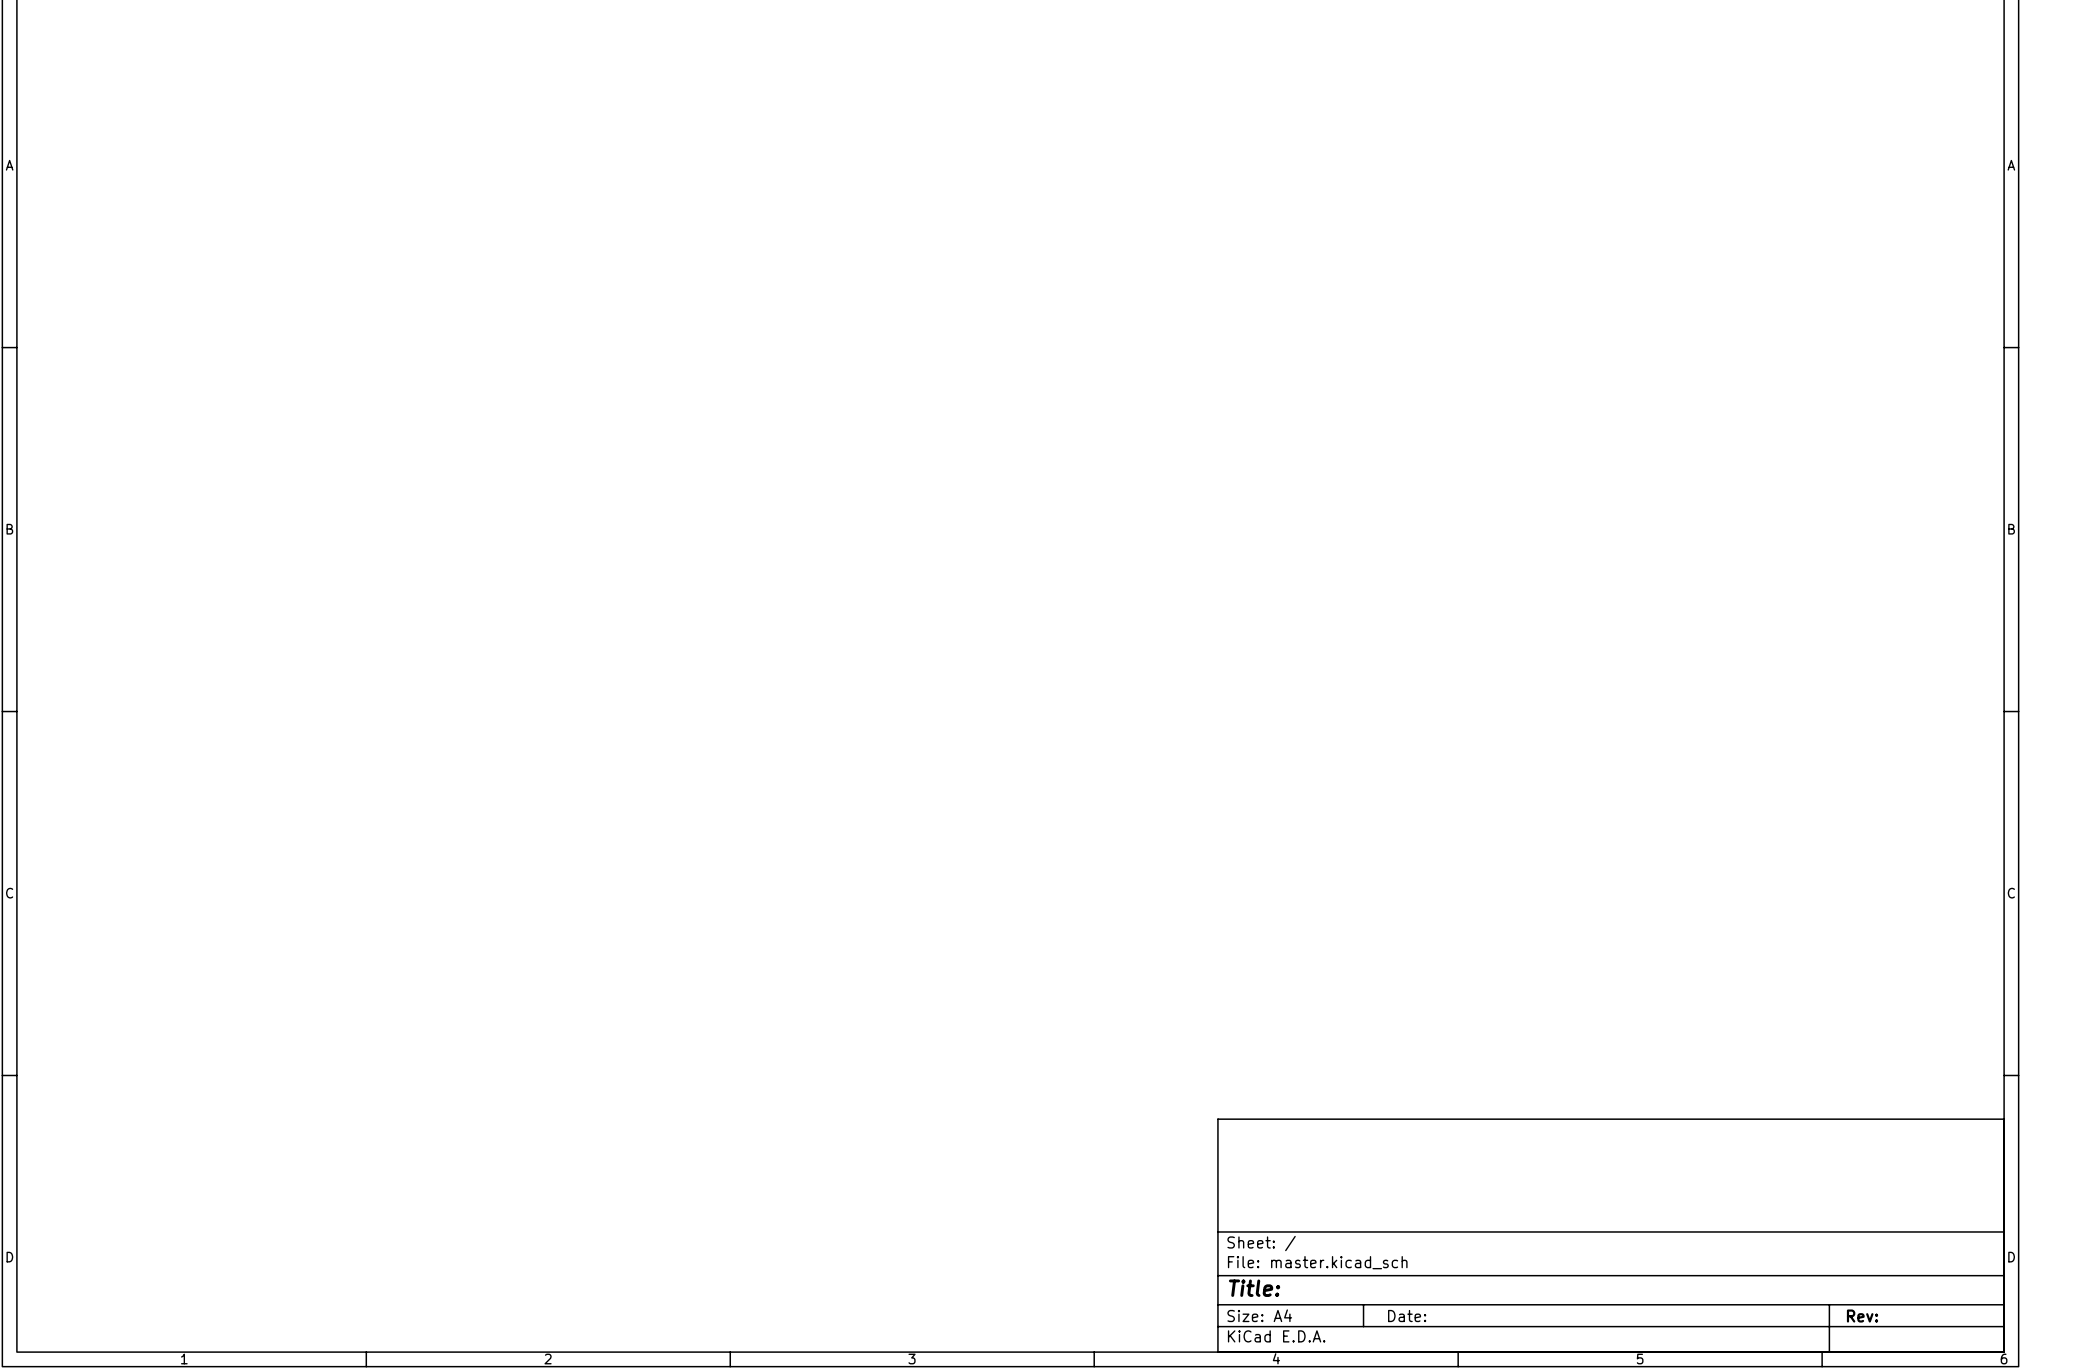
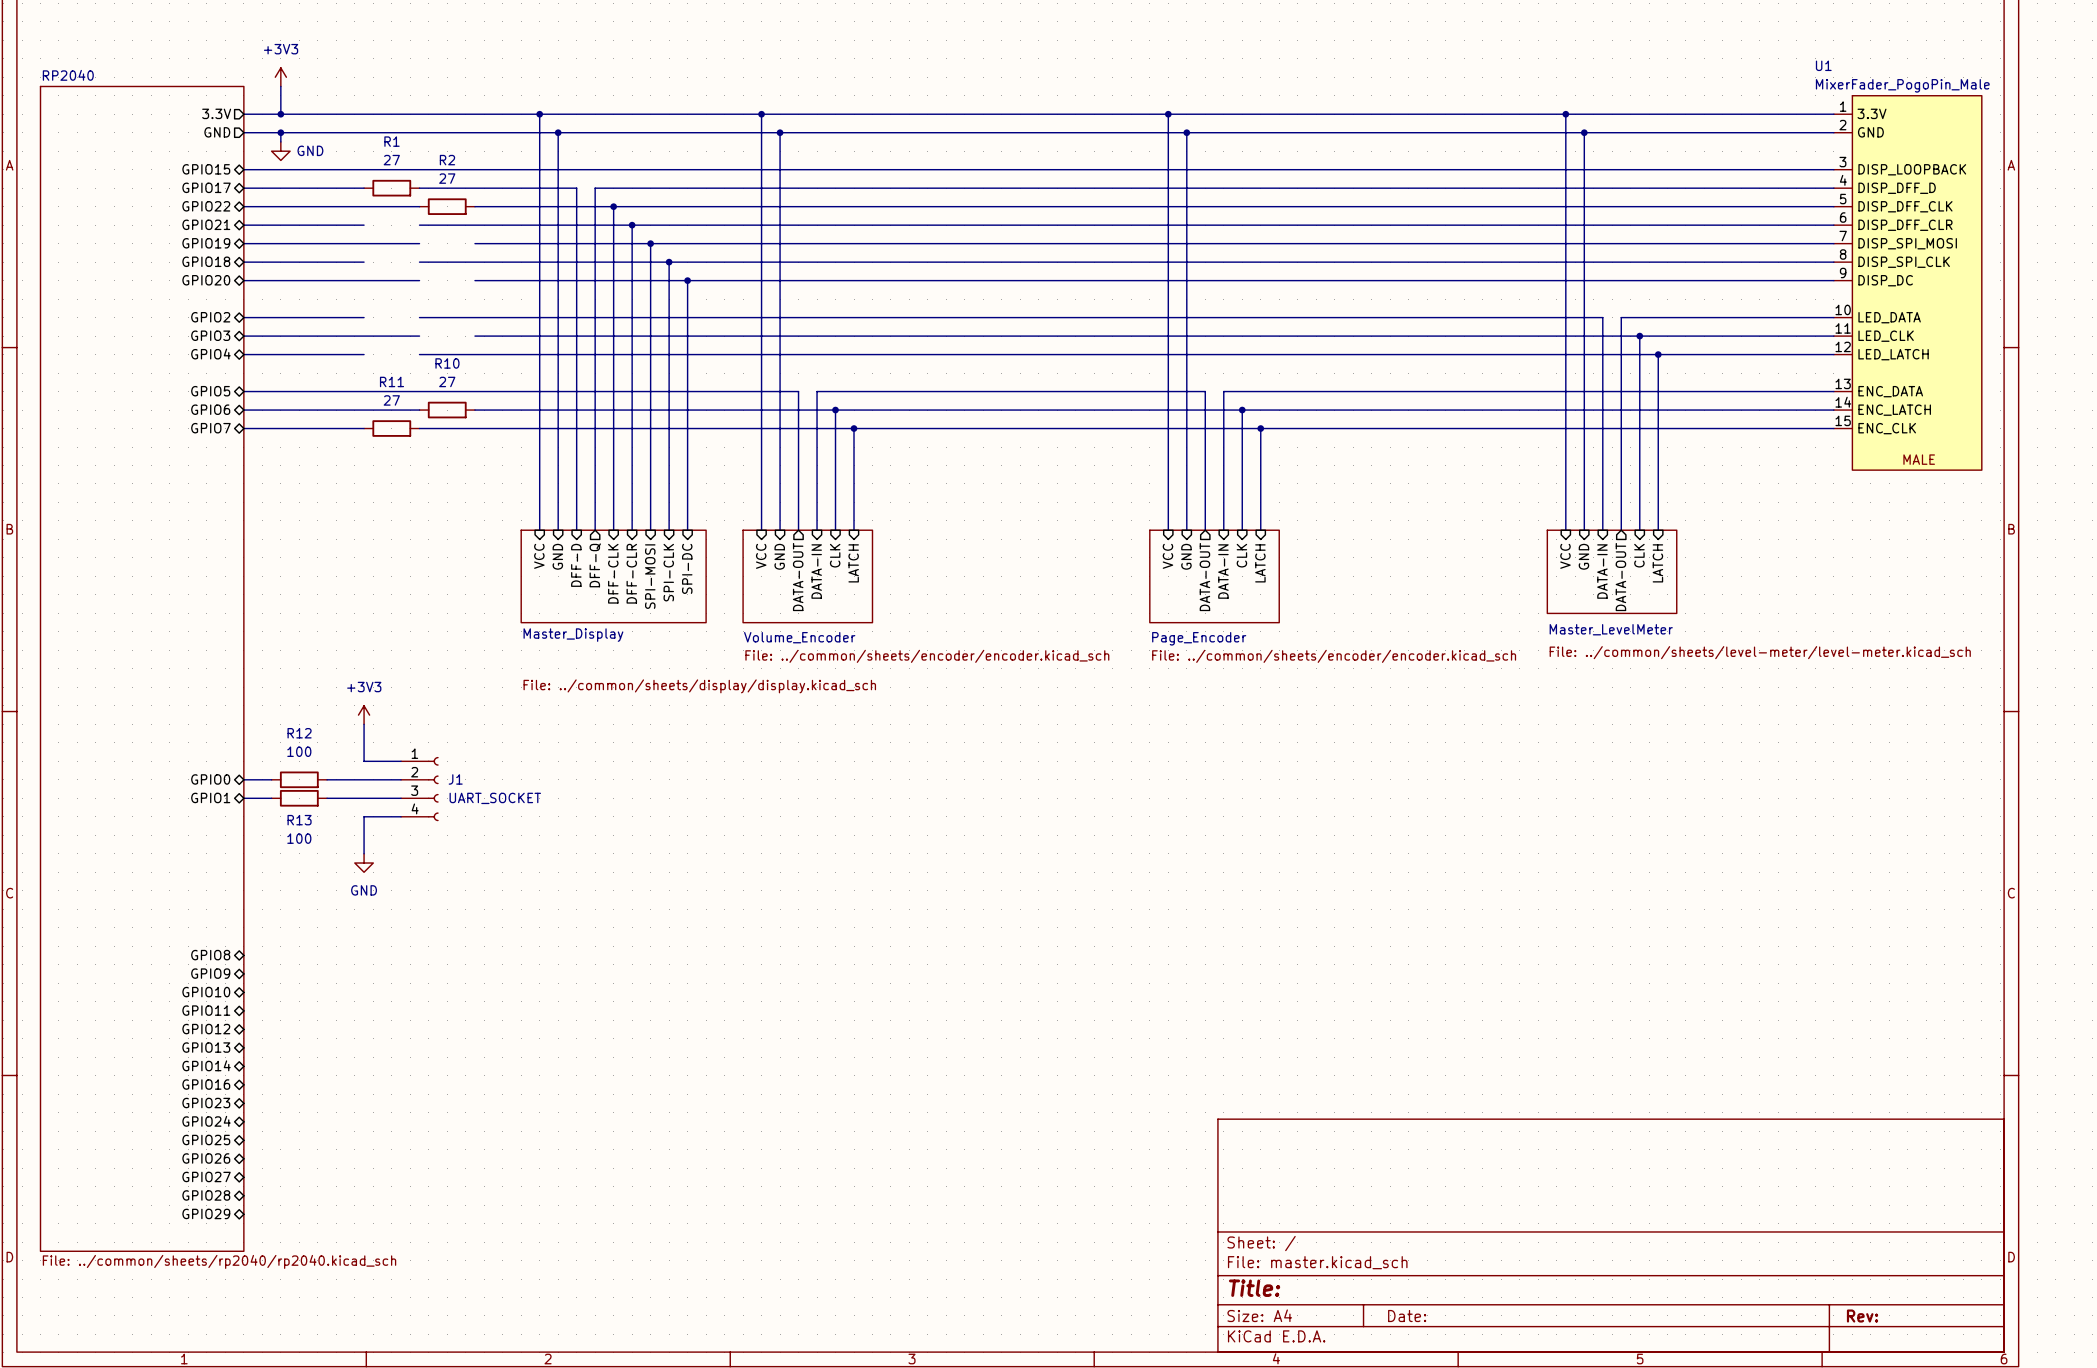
power symbol: none -> +3V3 (280, 77)
wire: none -> (280, 86) (280, 114)
sheet pin: none -> 3.3V (216, 113)
wire: none -> (243, 114) (1833, 114)
junction: none -> (280, 114)
wire: none -> (539, 114) (539, 530)
junction: none -> (539, 114)
wire: none -> (761, 114) (761, 530)
junction: none -> (761, 114)
wire: none -> (1168, 114) (1168, 530)
junction: none -> (1168, 114)
wire: none -> (1565, 114) (1565, 530)
junction: none -> (1565, 114)
sheet pin: none -> GND (217, 132)
wire: none -> (243, 132) (1833, 132)
wire: none -> (280, 132) (280, 141)
junction: none -> (280, 132)
wire: none -> (558, 132) (558, 530)
junction: none -> (558, 132)
wire: none -> (780, 132) (780, 530)
junction: none -> (780, 132)
wire: none -> (1186, 132) (1186, 530)
junction: none -> (1186, 132)
wire: none -> (1584, 132) (1584, 530)
junction: none -> (1584, 132)
power symbol: none -> GND (280, 151)
sheet pin: none -> GPIO15 (206, 169)
wire: none -> (243, 169) (1833, 169)
sheet pin: none -> GPIO17 (206, 187)
wire: none -> (243, 188) (364, 188)
R1: none -> 27 (391, 188)
wire: none -> (419, 188) (576, 188) (576, 530)
wire: none -> (1833, 188) (595, 188) (595, 530)
sheet pin: none -> GPIO22 (206, 206)
wire: none -> (243, 206) (419, 206)
R2: none -> 27 (447, 206)
wire: none -> (474, 206) (1833, 206)
wire: none -> (613, 206) (613, 530)
junction: none -> (613, 206)
sheet pin: none -> GPIO21 (206, 224)
wire: none -> (243, 225) (364, 225)
wire: none -> (419, 225) (1833, 225)
wire: none -> (632, 225) (632, 530)
junction: none -> (632, 225)
sheet pin: none -> GPIO19 (206, 243)
wire: none -> (243, 243) (419, 243)
wire: none -> (474, 243) (1833, 243)
wire: none -> (650, 243) (650, 530)
junction: none -> (650, 243)
sheet pin: none -> GPIO18 (206, 261)
wire: none -> (243, 262) (364, 262)
wire: none -> (419, 262) (1833, 262)
wire: none -> (669, 262) (669, 530)
junction: none -> (669, 262)
sheet pin: none -> GPIO20 (206, 280)
wire: none -> (243, 280) (419, 280)
wire: none -> (474, 280) (1833, 280)
wire: none -> (687, 280) (687, 530)
junction: none -> (687, 280)
U1: none -> MixerFader_PogoPin_Male (1907, 282)
sheet pin: none -> GPIO2 (210, 317)
wire: none -> (243, 317) (364, 317)
wire: none -> (419, 317) (1602, 317) (1602, 530)
wire: none -> (1833, 317) (1621, 317) (1621, 530)
sheet pin: none -> GPIO3 (210, 335)
wire: none -> (243, 336) (419, 336)
wire: none -> (474, 336) (1833, 336)
wire: none -> (1639, 336) (1639, 530)
junction: none -> (1639, 336)
sheet pin: none -> GPIO4 (210, 354)
wire: none -> (243, 354) (364, 354)
wire: none -> (419, 354) (1833, 354)
wire: none -> (1658, 354) (1658, 530)
junction: none -> (1658, 354)
sheet pin: none -> GPIO5 (210, 391)
wire: none -> (243, 391) (798, 391) (798, 530)
wire: none -> (1833, 391) (1223, 391) (1223, 530)
sheet pin: none -> GPIO6 (210, 409)
wire: none -> (243, 410) (419, 410)
R10: none -> 27 (447, 410)
wire: none -> (474, 410) (1833, 410)
wire: none -> (835, 410) (835, 530)
junction: none -> (835, 410)
wire: none -> (1242, 410) (1242, 530)
junction: none -> (1242, 410)
sheet pin: none -> GPIO7 (210, 428)
wire: none -> (243, 428) (364, 428)
R11: none -> 27 (391, 428)
wire: none -> (419, 428) (1833, 428)
wire: none -> (854, 428) (854, 530)
junction: none -> (854, 428)
wire: none -> (1260, 428) (1260, 530)
junction: none -> (1260, 428)
wire: none -> (817, 530) (817, 391) (1205, 391) (1205, 530)
sheet pin: none -> CLK (835, 555)
sheet pin: none -> CLK (1241, 555)
sheet pin: none -> CLK (1639, 555)
sheet pin: none -> VCC (539, 556)
sheet pin: none -> GND (557, 556)
sheet pin: none -> VCC (761, 556)
sheet pin: none -> GND (779, 556)
sheet pin: none -> VCC (1167, 556)
sheet pin: none -> GND (1186, 556)
sheet pin: none -> VCC (1565, 556)
sheet pin: none -> GND (1583, 556)
sheet pin: none -> LATCH (853, 563)
sheet pin: none -> LATCH (1260, 563)
sheet pin: none -> LATCH (1657, 563)
sheet pin: none -> DFF-D (576, 565)
sheet pin: none -> DFF-Q (595, 565)
sheet pin: none -> SPI-DC (687, 568)
sheet pin: none -> DATA-IN (816, 571)
sheet pin: none -> DATA-IN (1223, 571)
sheet pin: none -> DATA-IN (1602, 571)
sheet Master_LevelMeter: none -> File: ../common/sheets/level-meter/level-meter.kicad_sch (1612, 571)
sheet pin: none -> SPI-CLK (668, 572)
sheet pin: none -> DFF-CLK (613, 573)
sheet pin: none -> DFF-CLR (631, 573)
sheet Master_Display: none -> File: ../common/sheets/display/display.kicad_sch (613, 576)
sheet pin: none -> SPI-MOSI (650, 576)
sheet Volume_Encoder: none -> File: ../common/sheets/encoder/encoder.kicad_sch (807, 576)
sheet Page_Encoder: none -> File: ../common/sheets/encoder/encoder.kicad_sch (1214, 576)
sheet pin: none -> DATA-OUT (798, 577)
sheet pin: none -> DATA-OUT (1204, 577)
sheet pin: none -> DATA-OUT (1620, 577)
sheet RP2040: none -> File: ../common/sheets/rp2040/rp2040.kicad_sch (142, 668)
power symbol: none -> +3V3 (364, 715)
wire: none -> (364, 724) (364, 761) (401, 761)
sheet pin: none -> GPIO0 (210, 779)
wire: none -> (243, 779) (271, 779)
R12: none -> 100 (299, 779)
wire: none -> (327, 779) (401, 779)
J1: none -> UART_SOCKET (419, 789)
sheet pin: none -> GPIO1 (210, 797)
wire: none -> (243, 798) (271, 798)
R13: none -> 100 (299, 798)
wire: none -> (327, 798) (401, 798)
wire: none -> (401, 816) (364, 816) (364, 853)
power symbol: none -> GND (364, 863)
sheet pin: none -> GPIO8 (210, 955)
sheet pin: none -> GPIO9 (210, 973)
sheet pin: none -> GPIO10 (206, 992)
sheet pin: none -> GPIO11 (206, 1010)
sheet pin: none -> GPIO12 (206, 1029)
sheet pin: none -> GPIO13 (206, 1047)
sheet pin: none -> GPIO14 (206, 1065)
sheet pin: none -> GPIO16 (206, 1084)
sheet pin: none -> GPIO23 (206, 1103)
sheet pin: none -> GPIO24 (206, 1121)
sheet pin: none -> GPIO25 (206, 1140)
sheet pin: none -> GPIO26 (206, 1158)
sheet pin: none -> GPIO27 (206, 1176)
sheet pin: none -> GPIO28 (206, 1195)
sheet pin: none -> GPIO29 (206, 1213)

